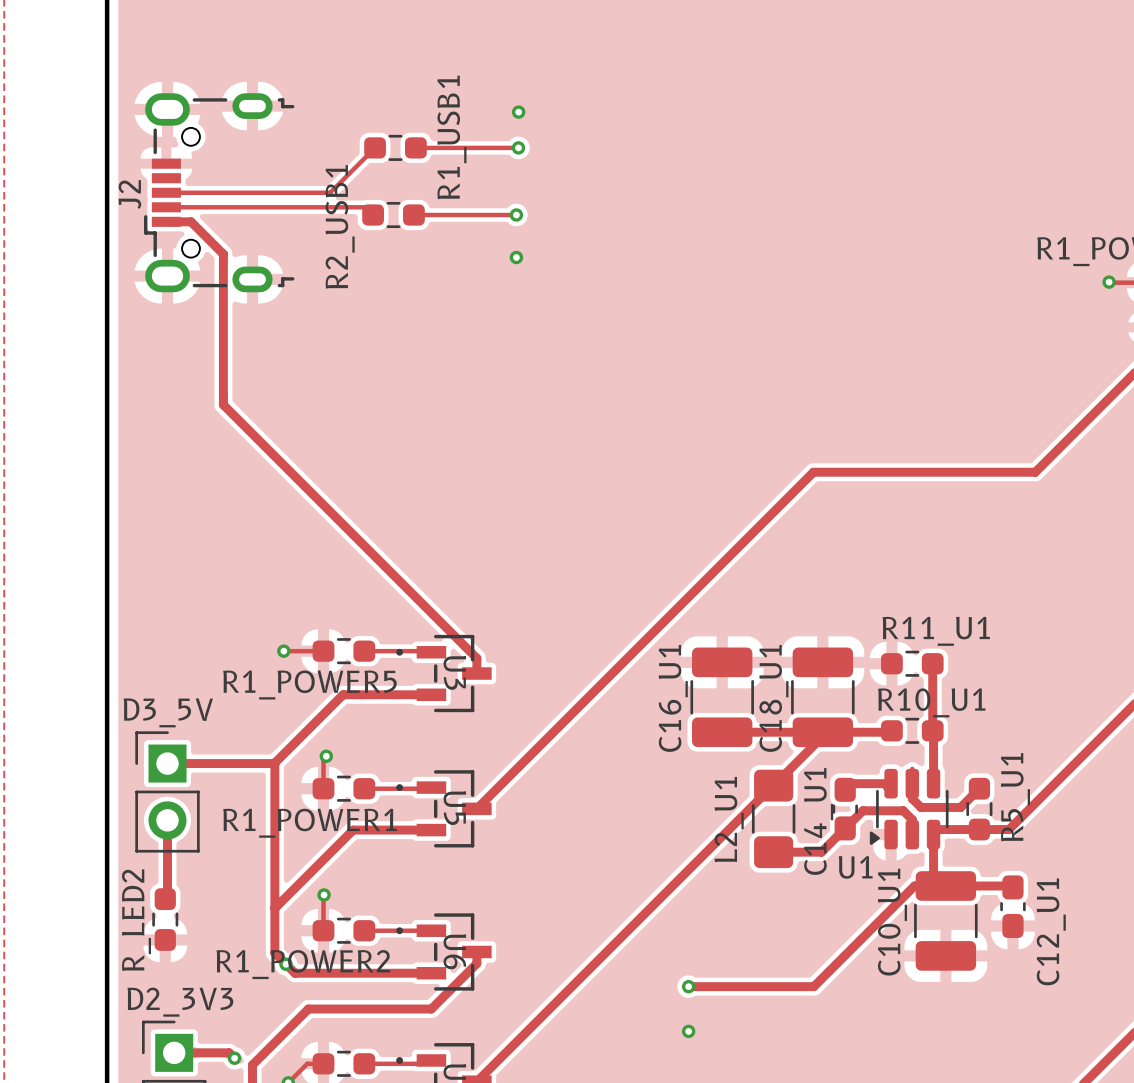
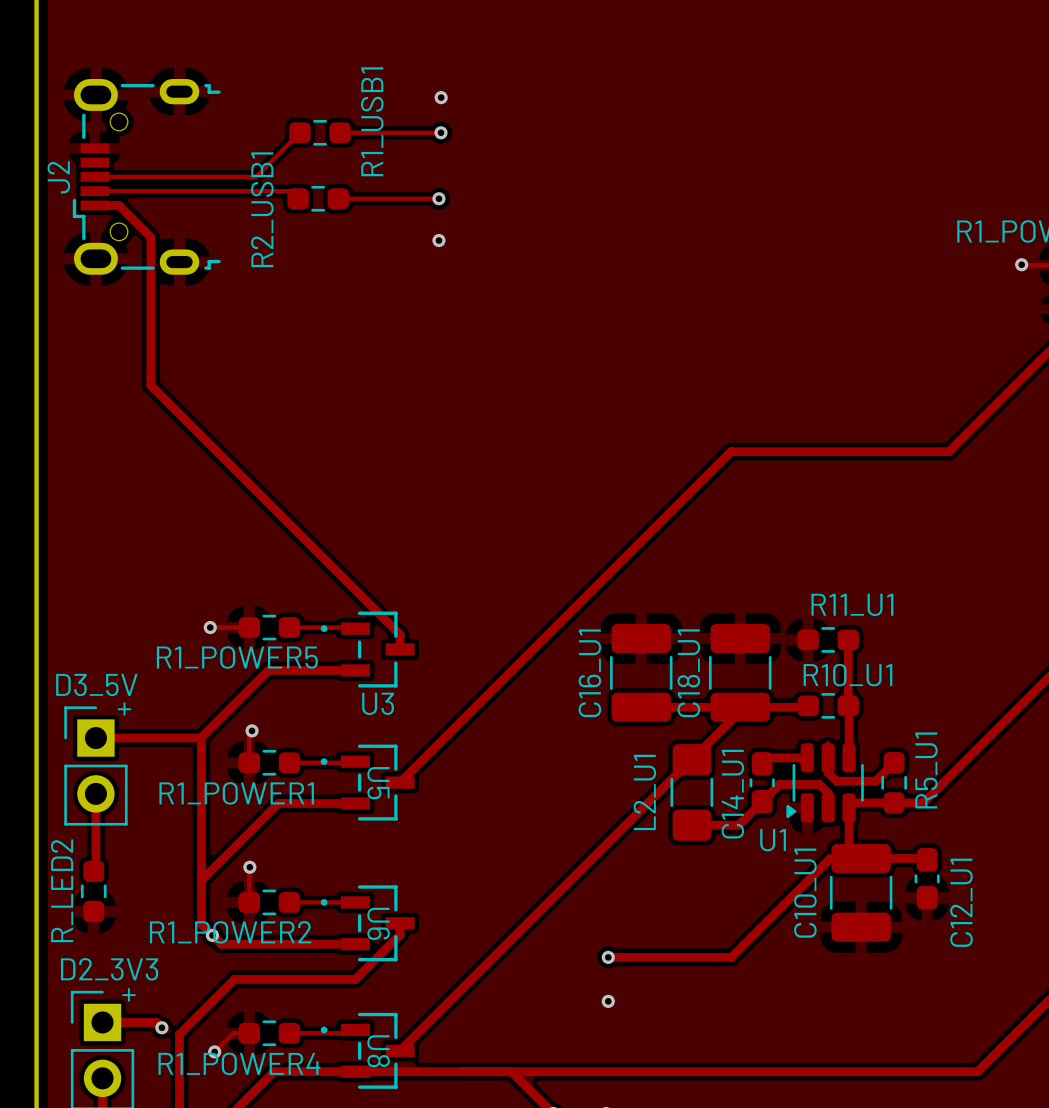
U3 name rotation: 0° (454, 672) -> 90° counterclockwise (378, 703)
U3 name position: U3 (454, 672) -> U3 (378, 703)
text: none -> + (124, 709)
text: none -> + (128, 994)

